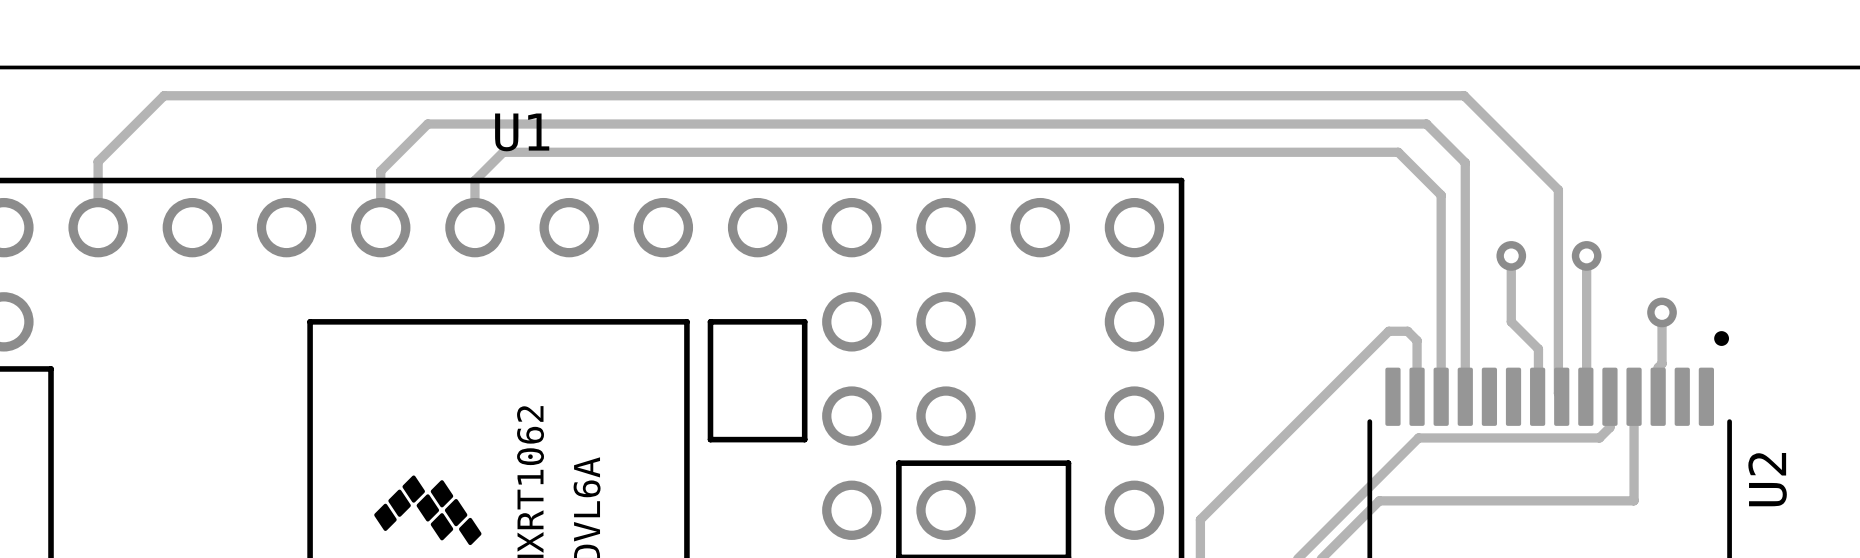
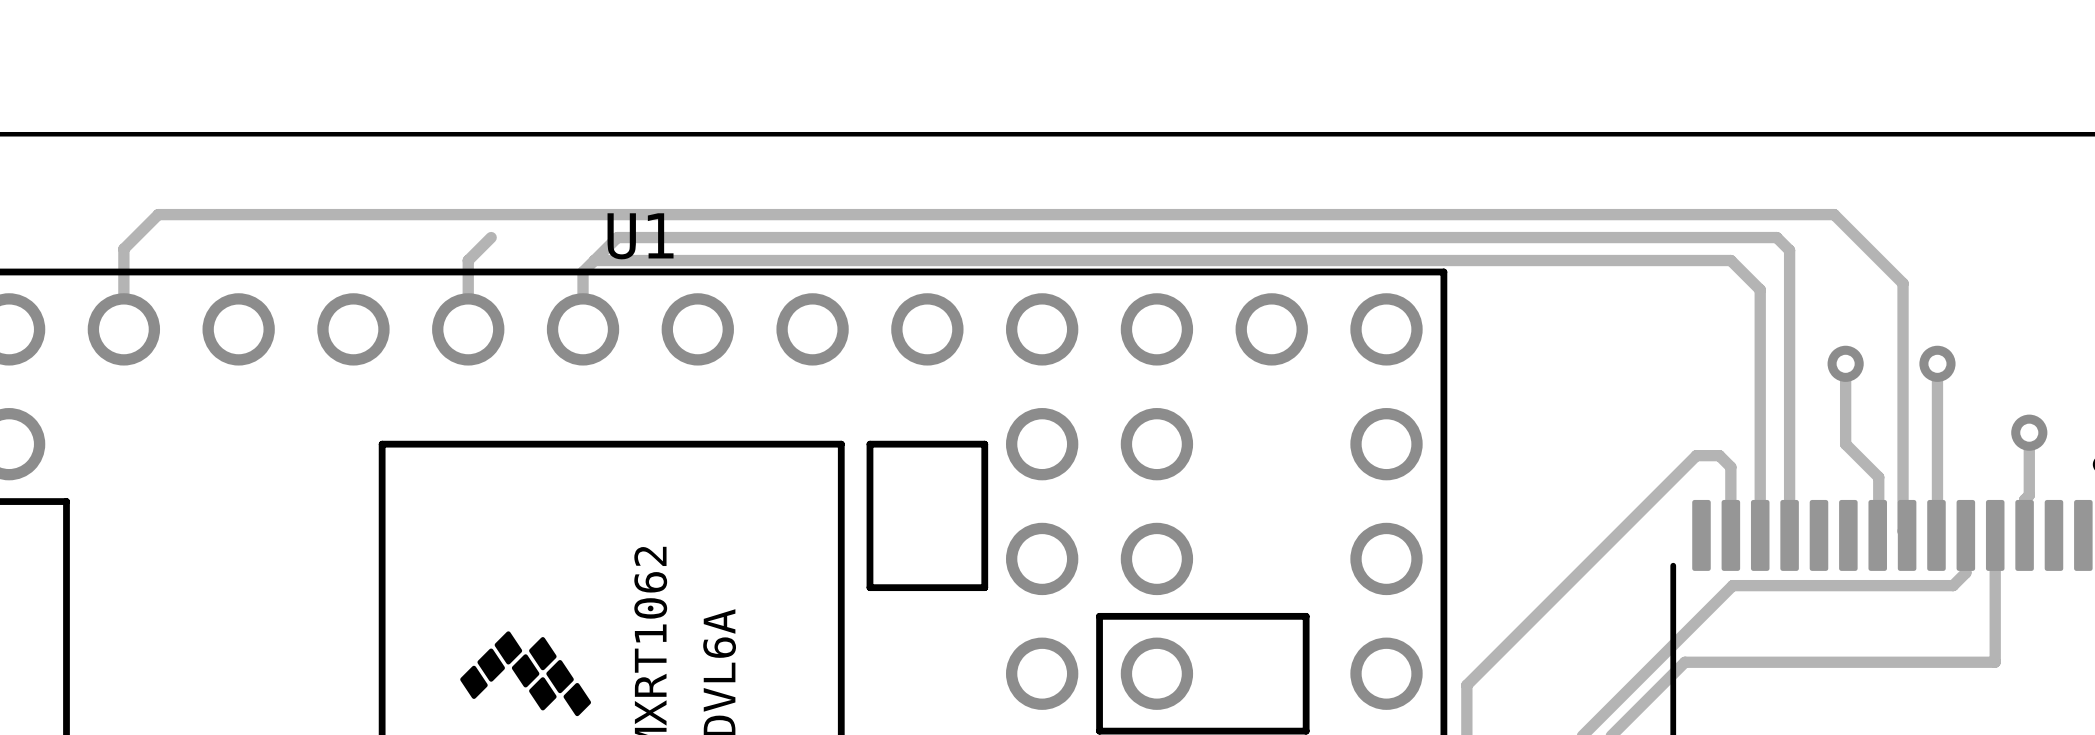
U1 name position: U1 (522, 132) -> U1 (640, 236)
track: (126, 133) (164, 95) (1464, 95) (1501, 133) -> (158, 214) (1834, 214)
track: (399, 152) (427, 124) (1426, 124) (1454, 152) -> none
track: (1398, 152) (1417, 171) -> (1707, 237) (1776, 237)
track: none -> (594, 260) (1730, 260)

